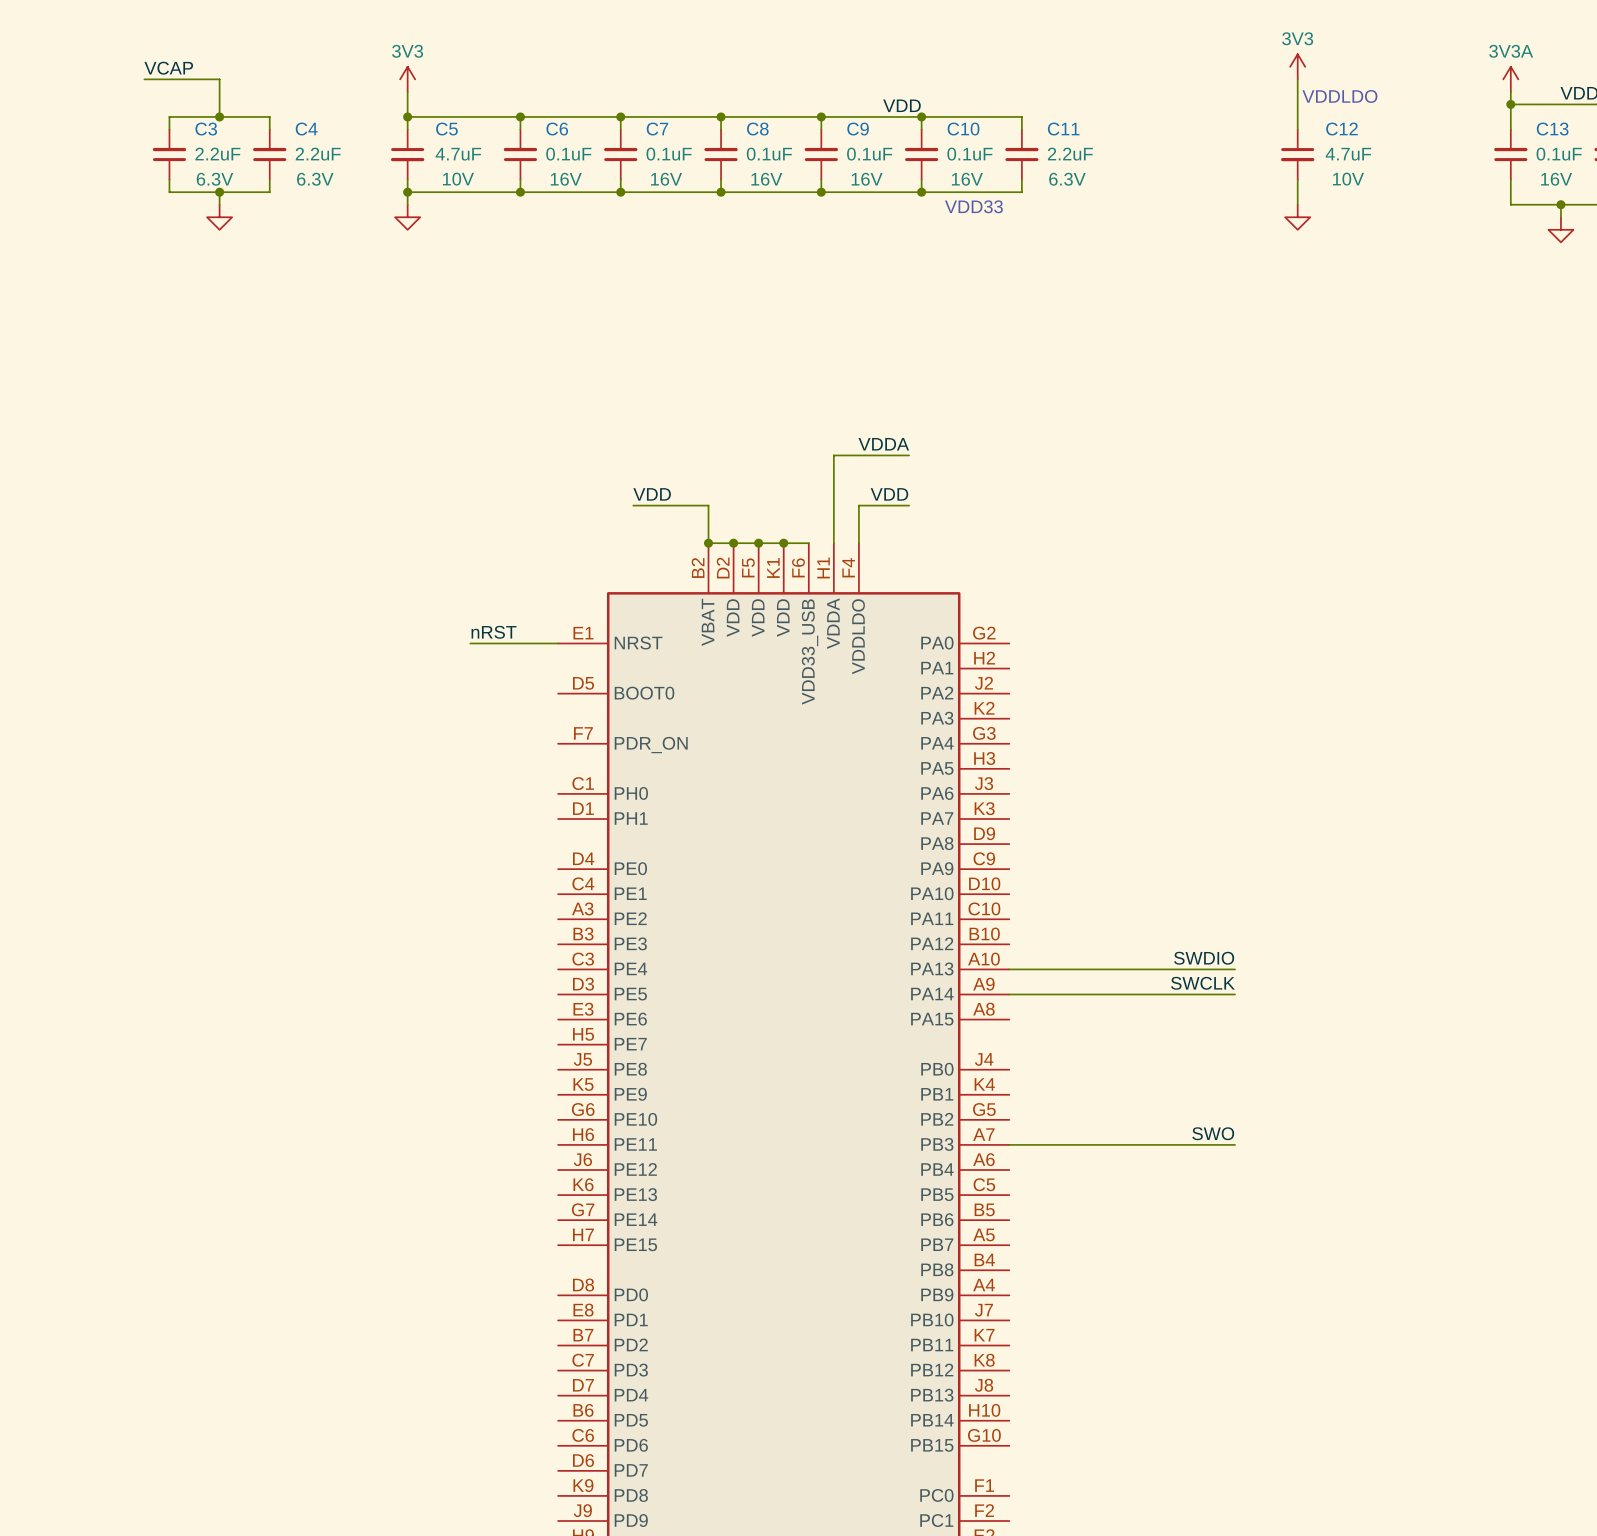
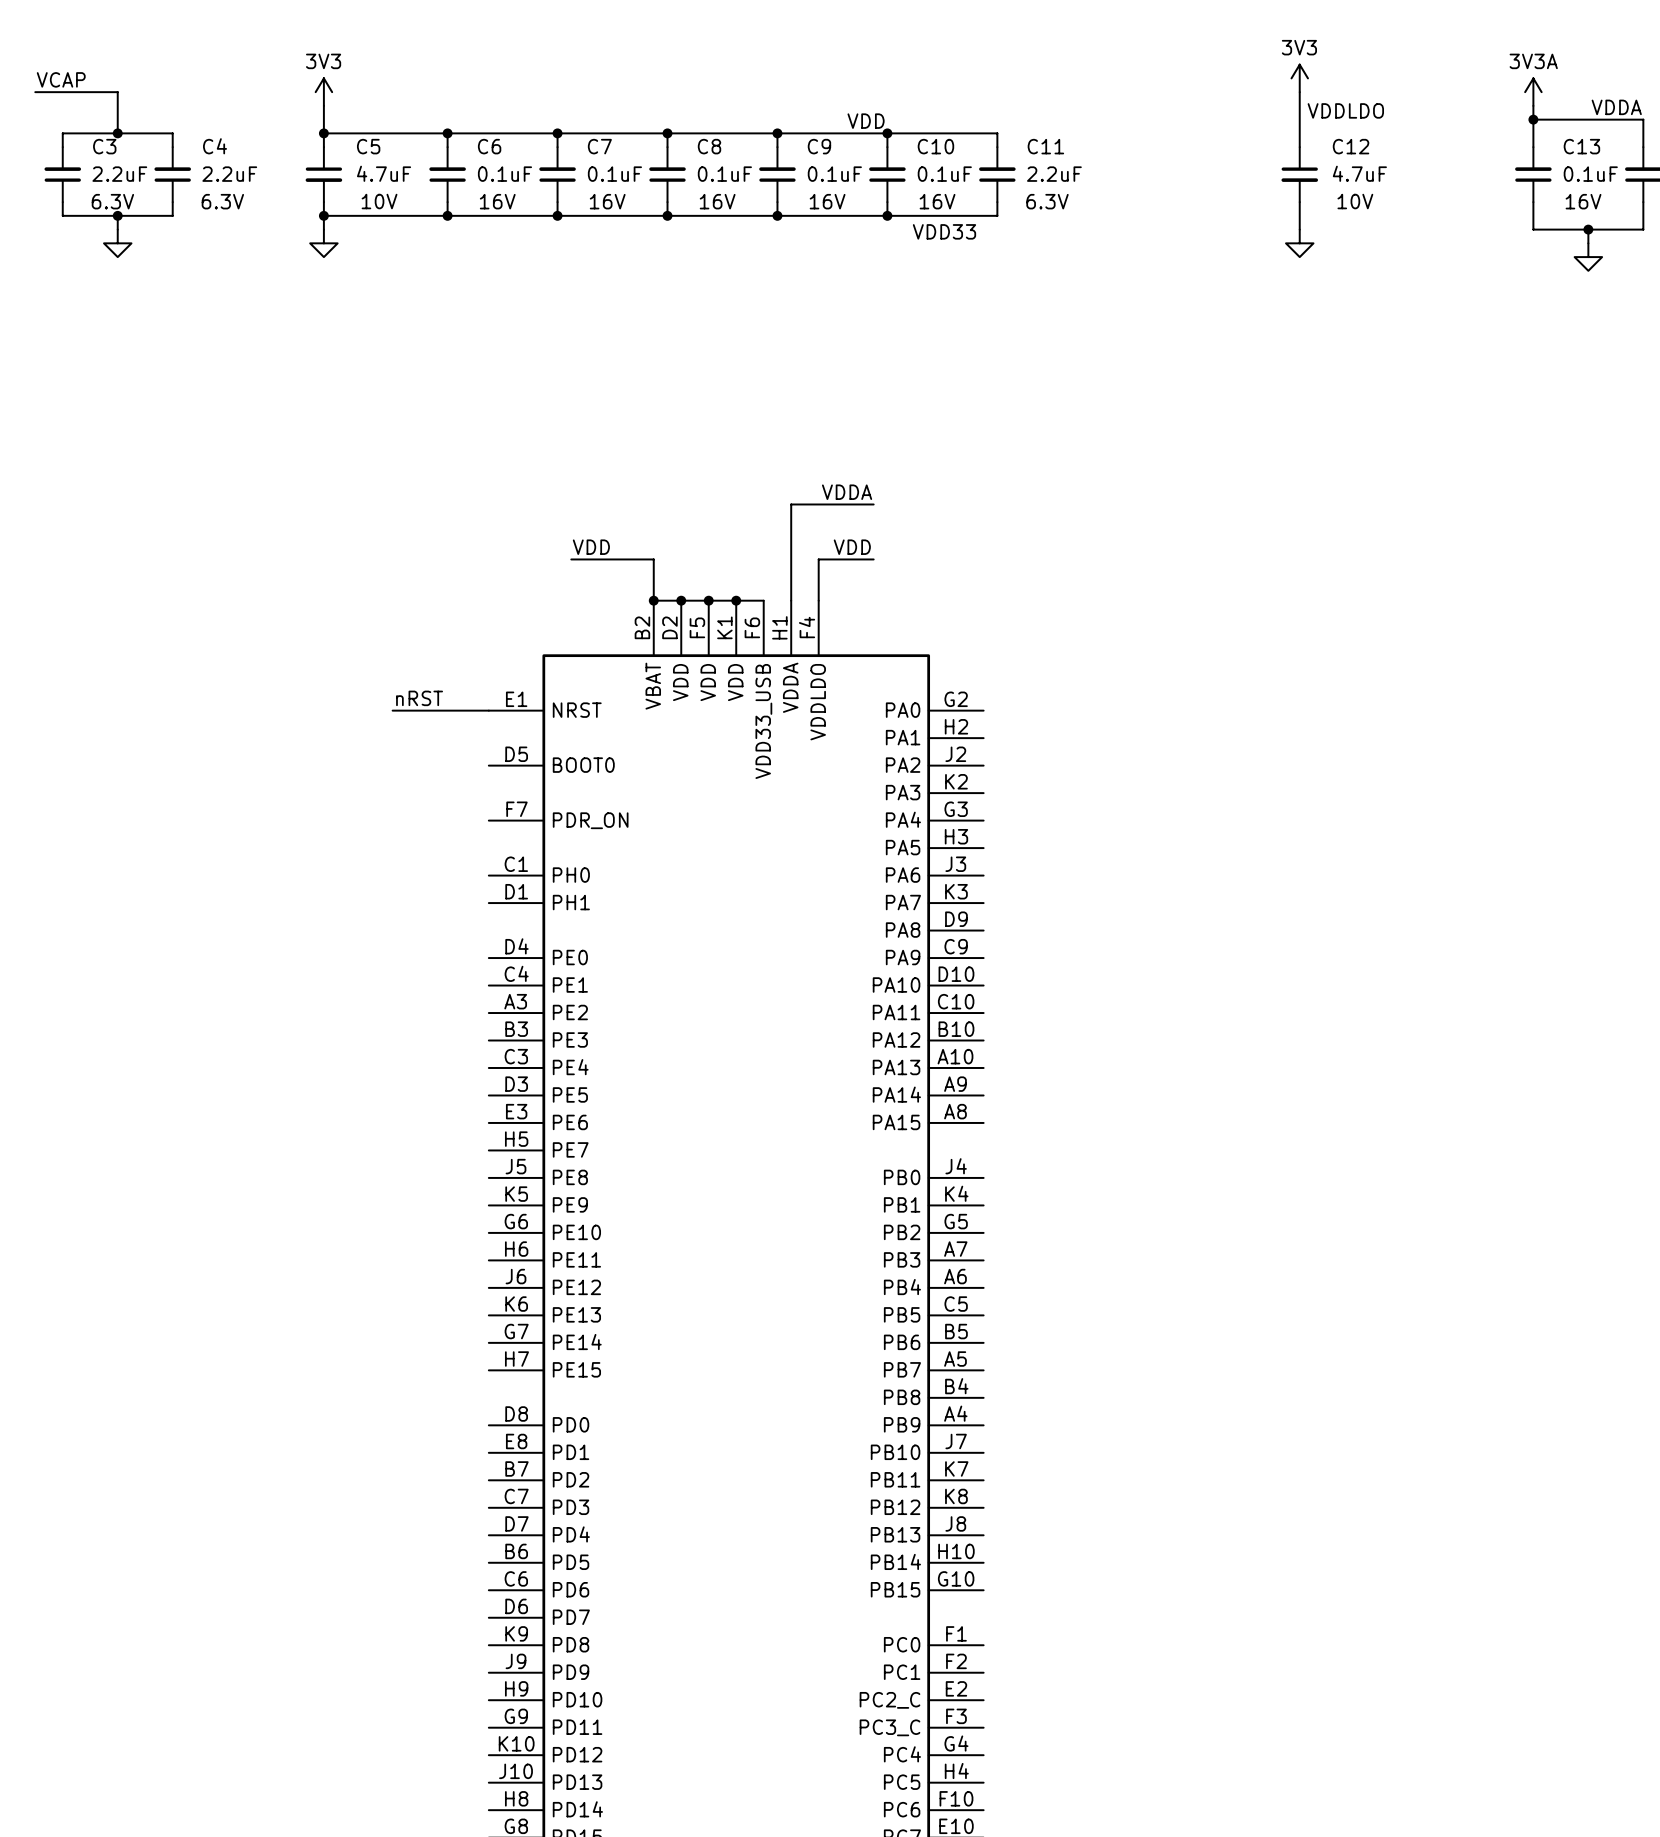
label: SWDIO (1204, 958) -> none
wire: (1009, 969) (1235, 969) -> none
label: SWCLK (1202, 983) -> none
wire: (1009, 994) (1235, 994) -> none
label: SWO (1213, 1133) -> none
wire: (1009, 1144) (1235, 1144) -> none

